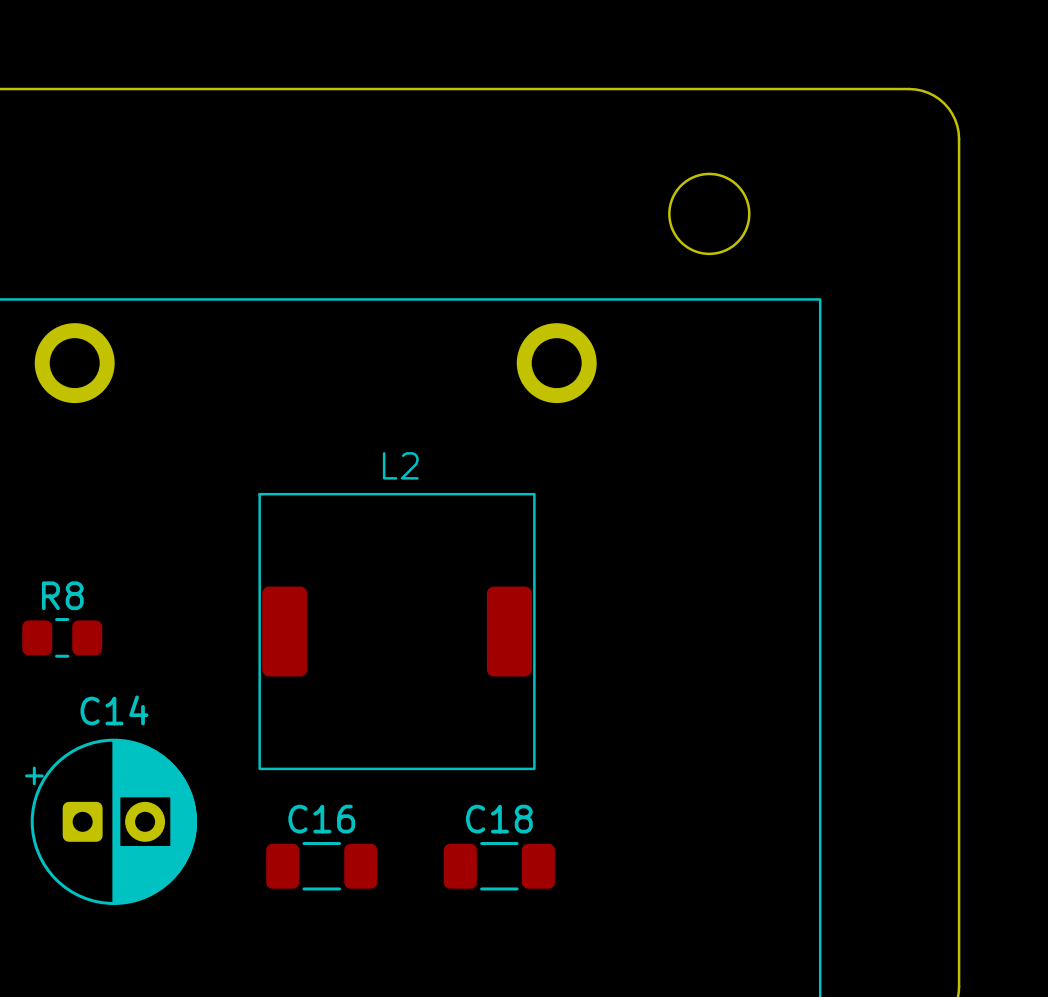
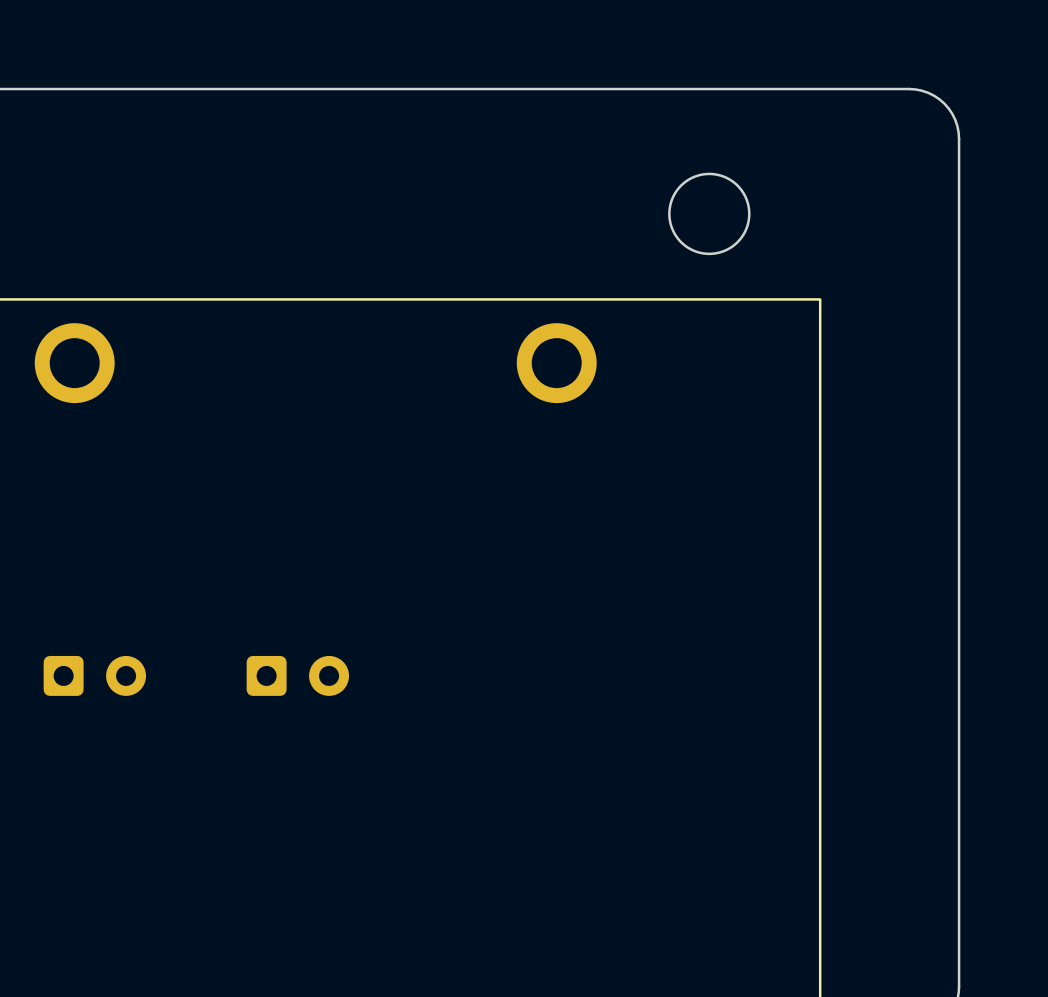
L2: (397, 631) -> none
R8: (62, 637) -> none
part: none -> (94, 675)
part: none -> (297, 675)
C14: (111, 821) -> none
C16: (321, 866) -> none
C18: (499, 866) -> none

